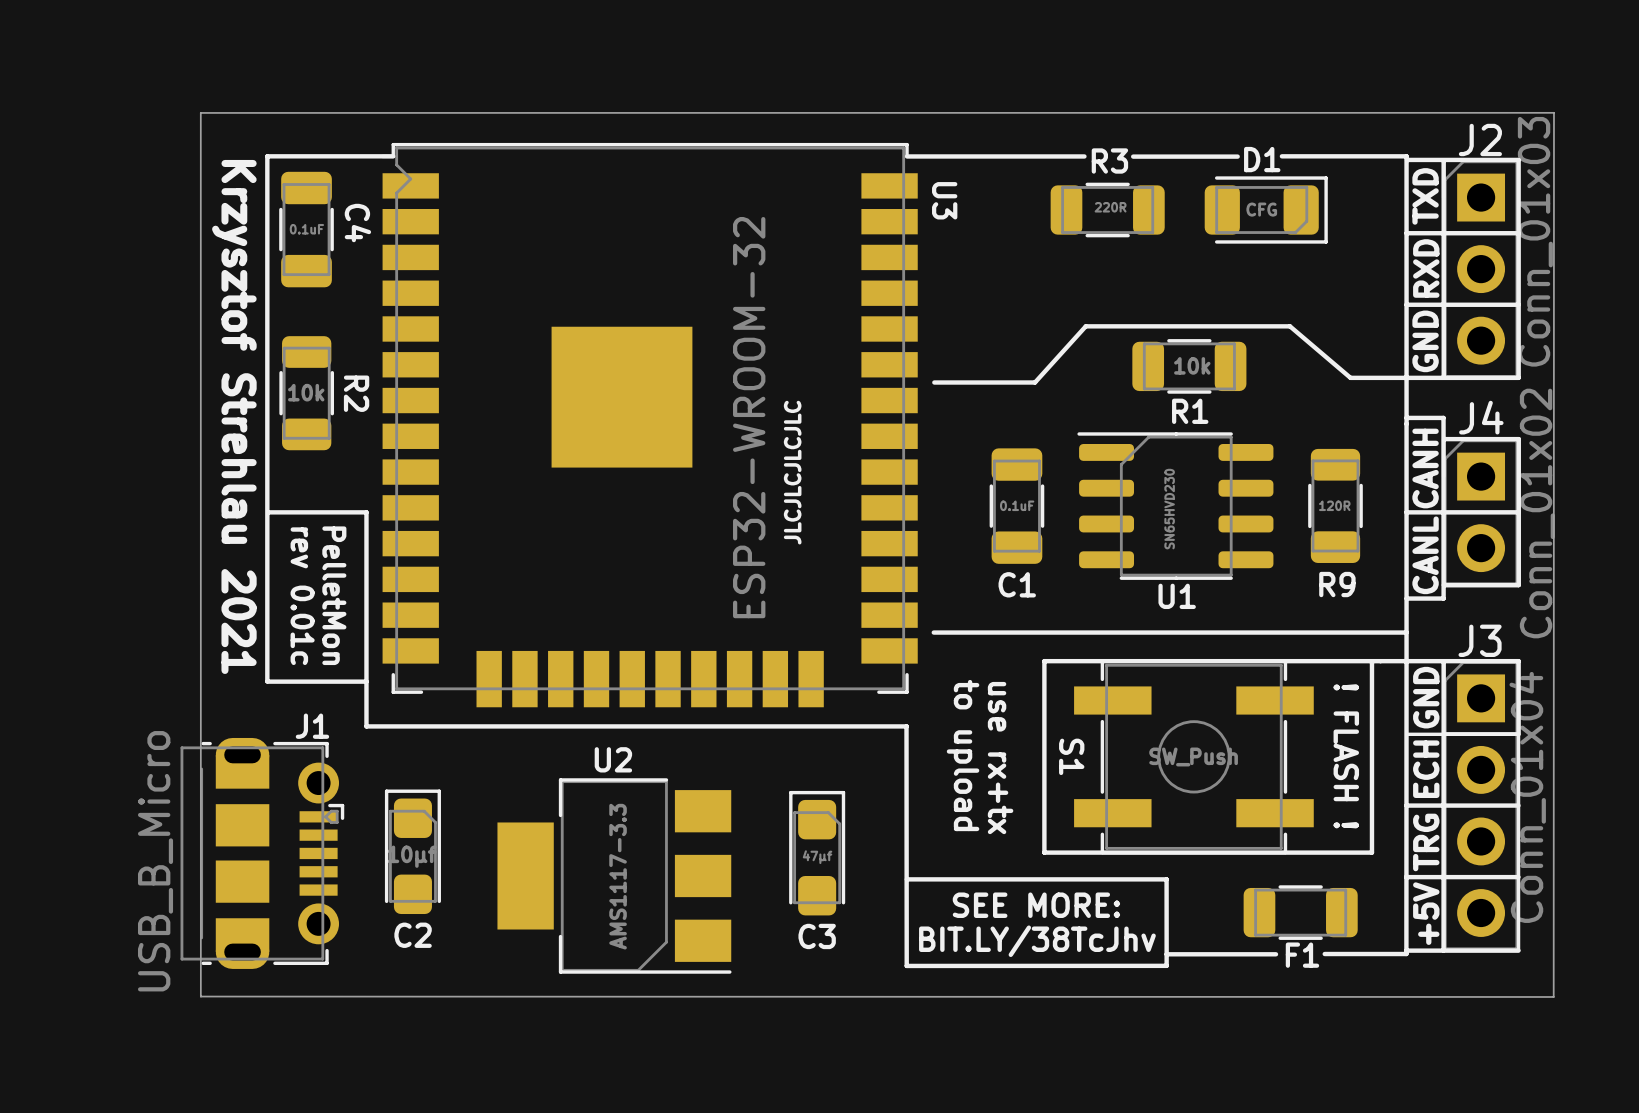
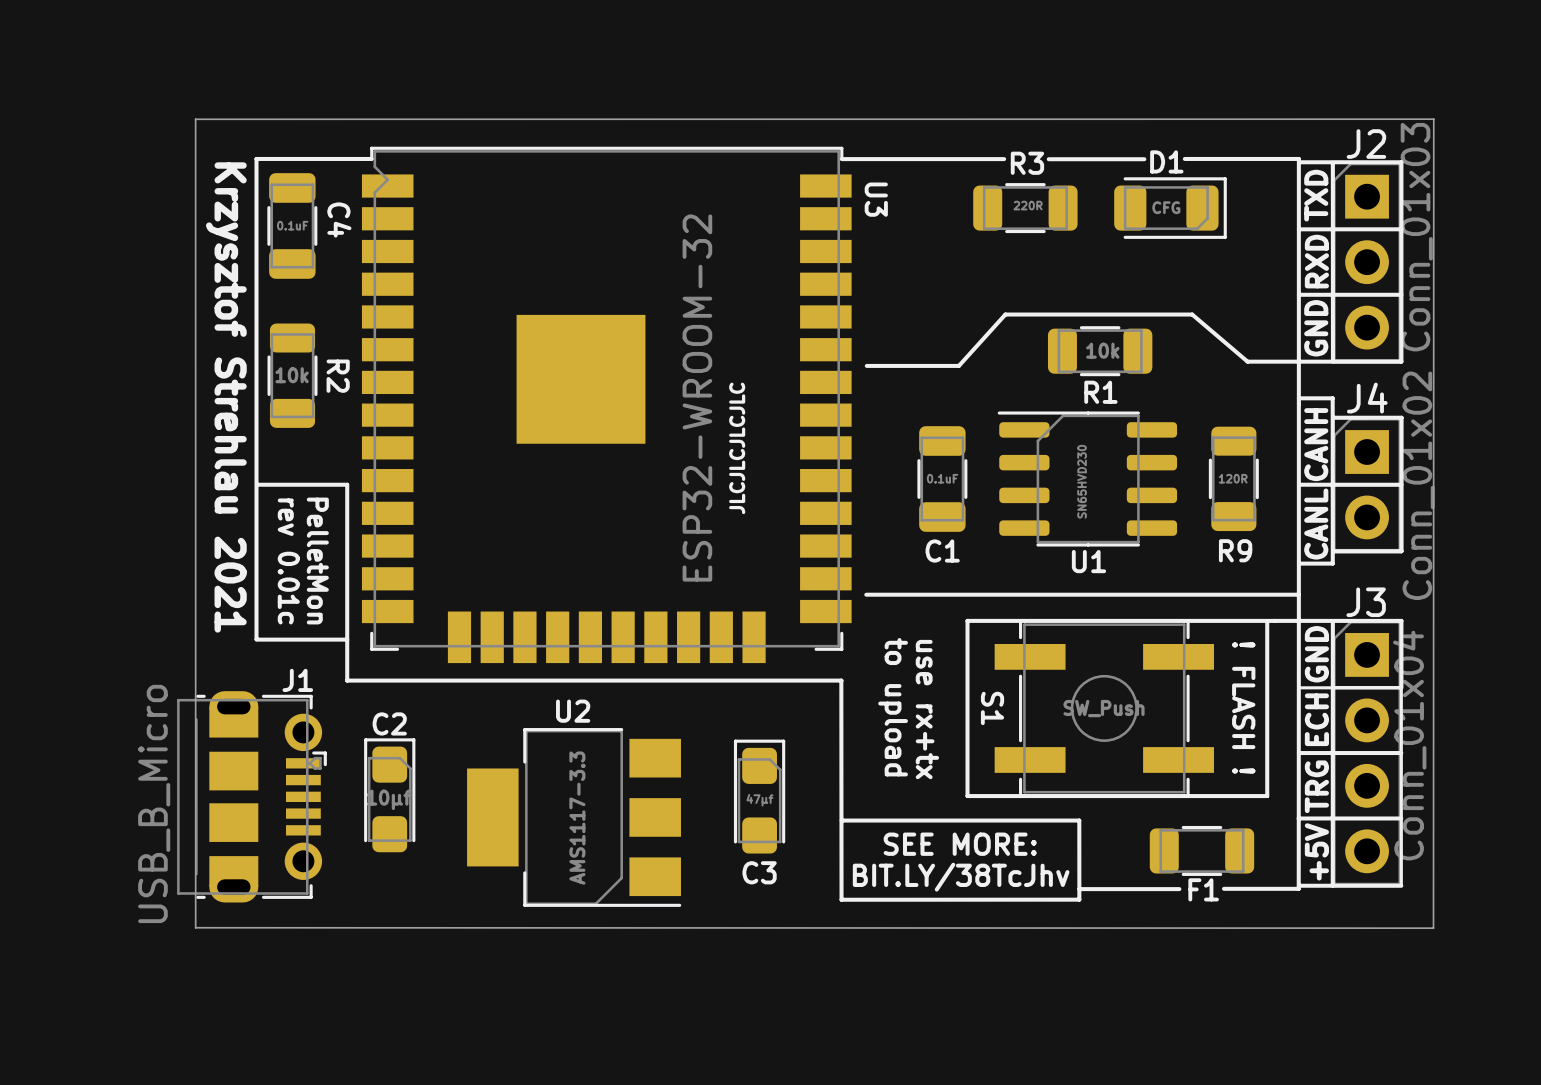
C2 name position: C2 (413, 935) -> C2 (389, 723)

